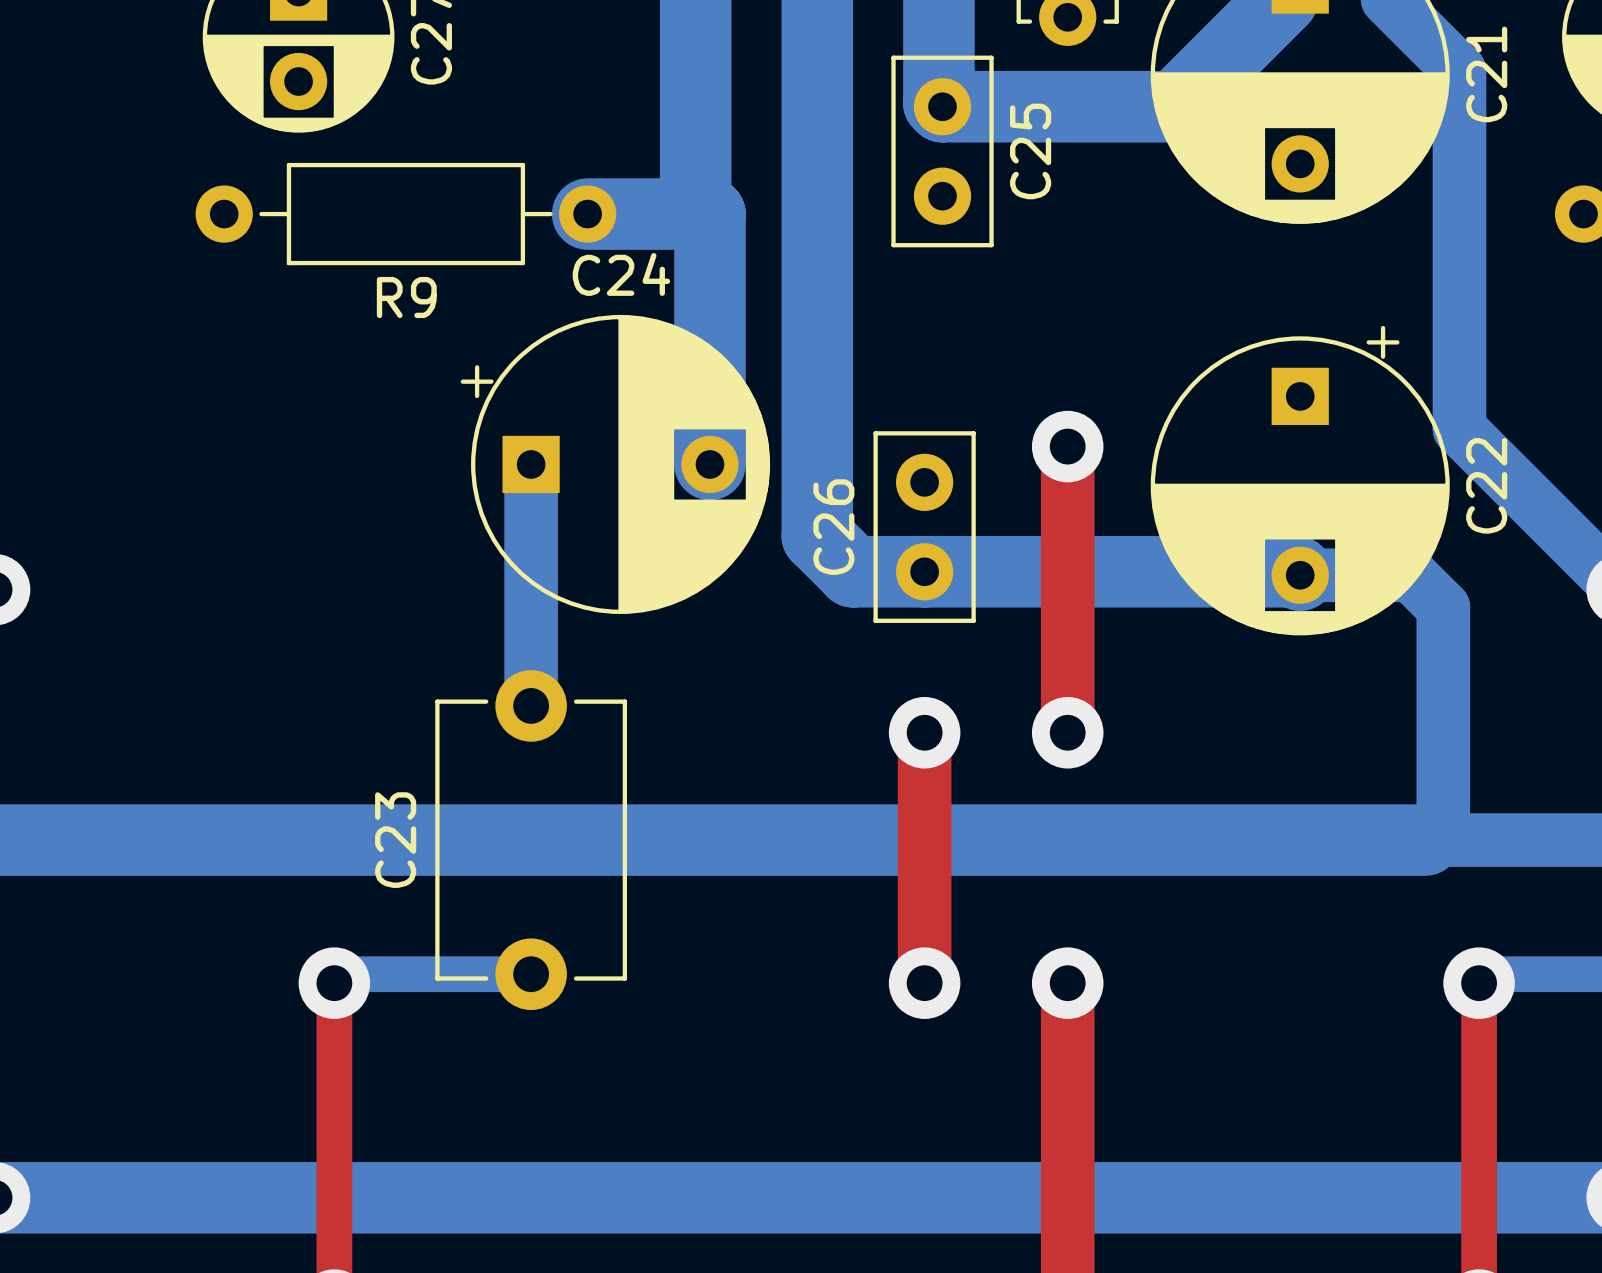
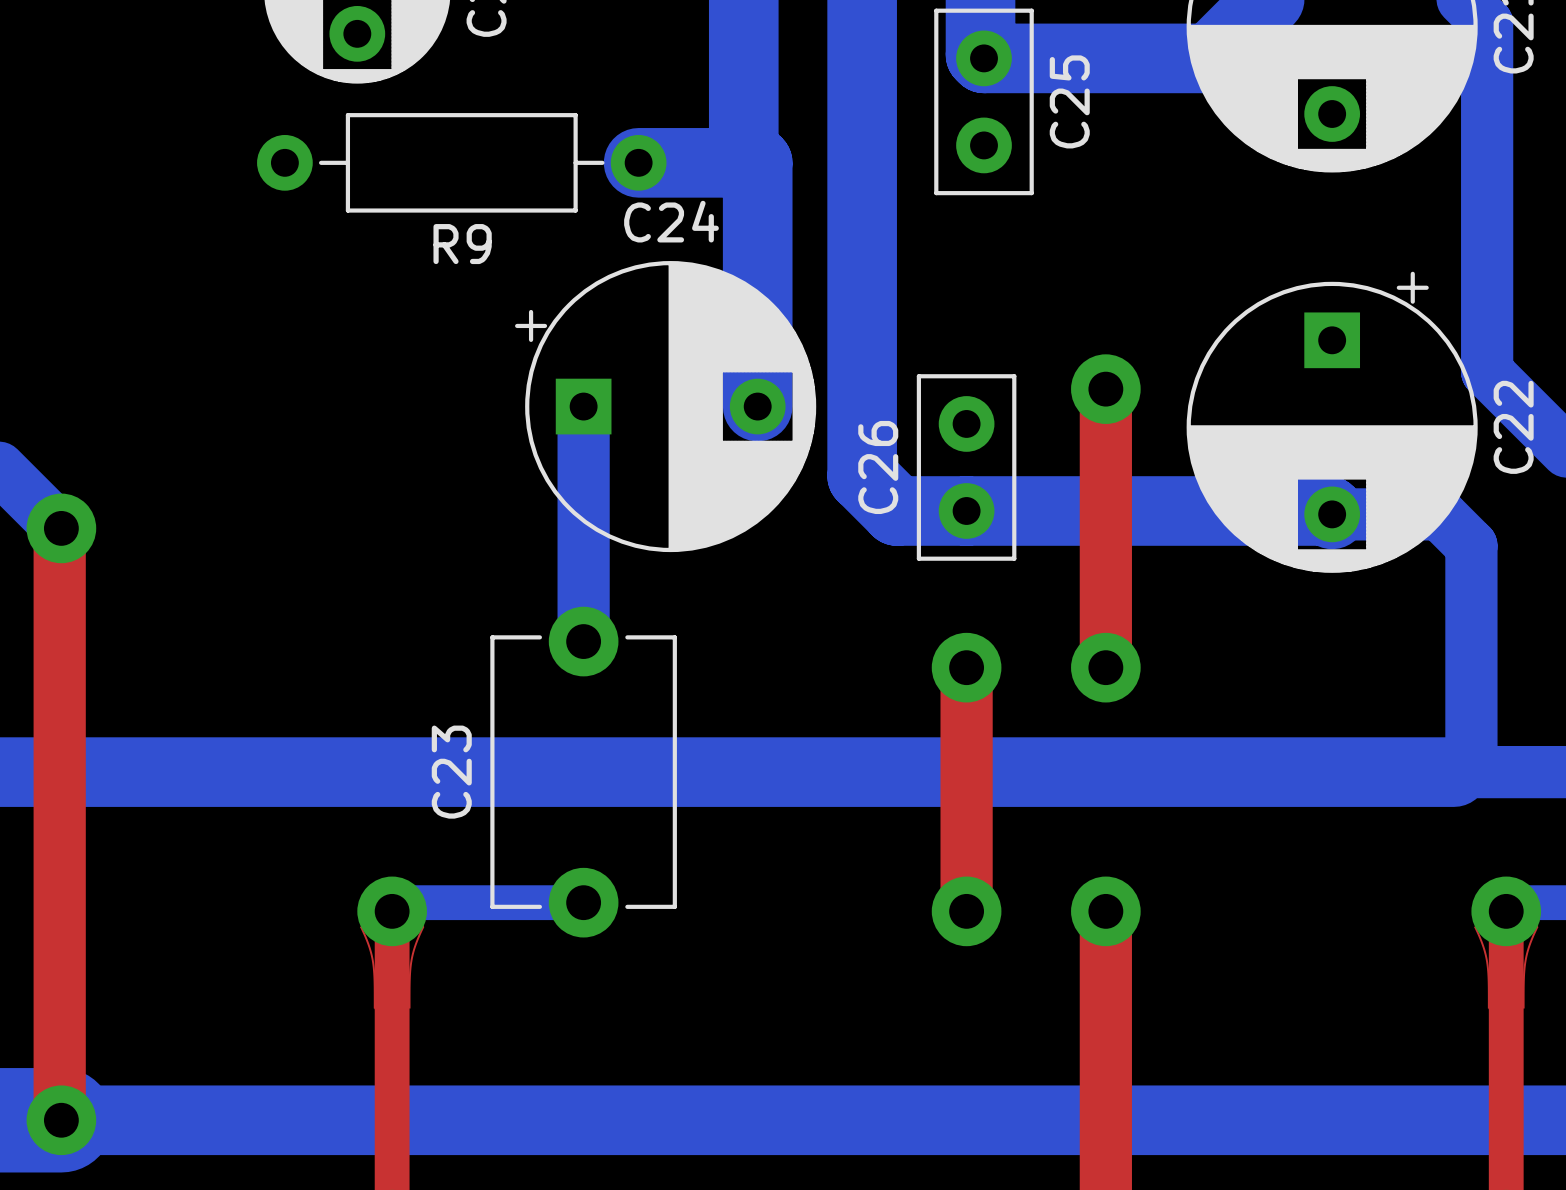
top zone outline: none -> (392, 893) (423, 926) (411, 959) (409, 1008) (374, 1008) (372, 959) (360, 926) (392, 893)
top zone outline: none -> (1506, 893) (1537, 926) (1525, 959) (1523, 1008) (1488, 1008) (1486, 959) (1474, 926) (1506, 893)

